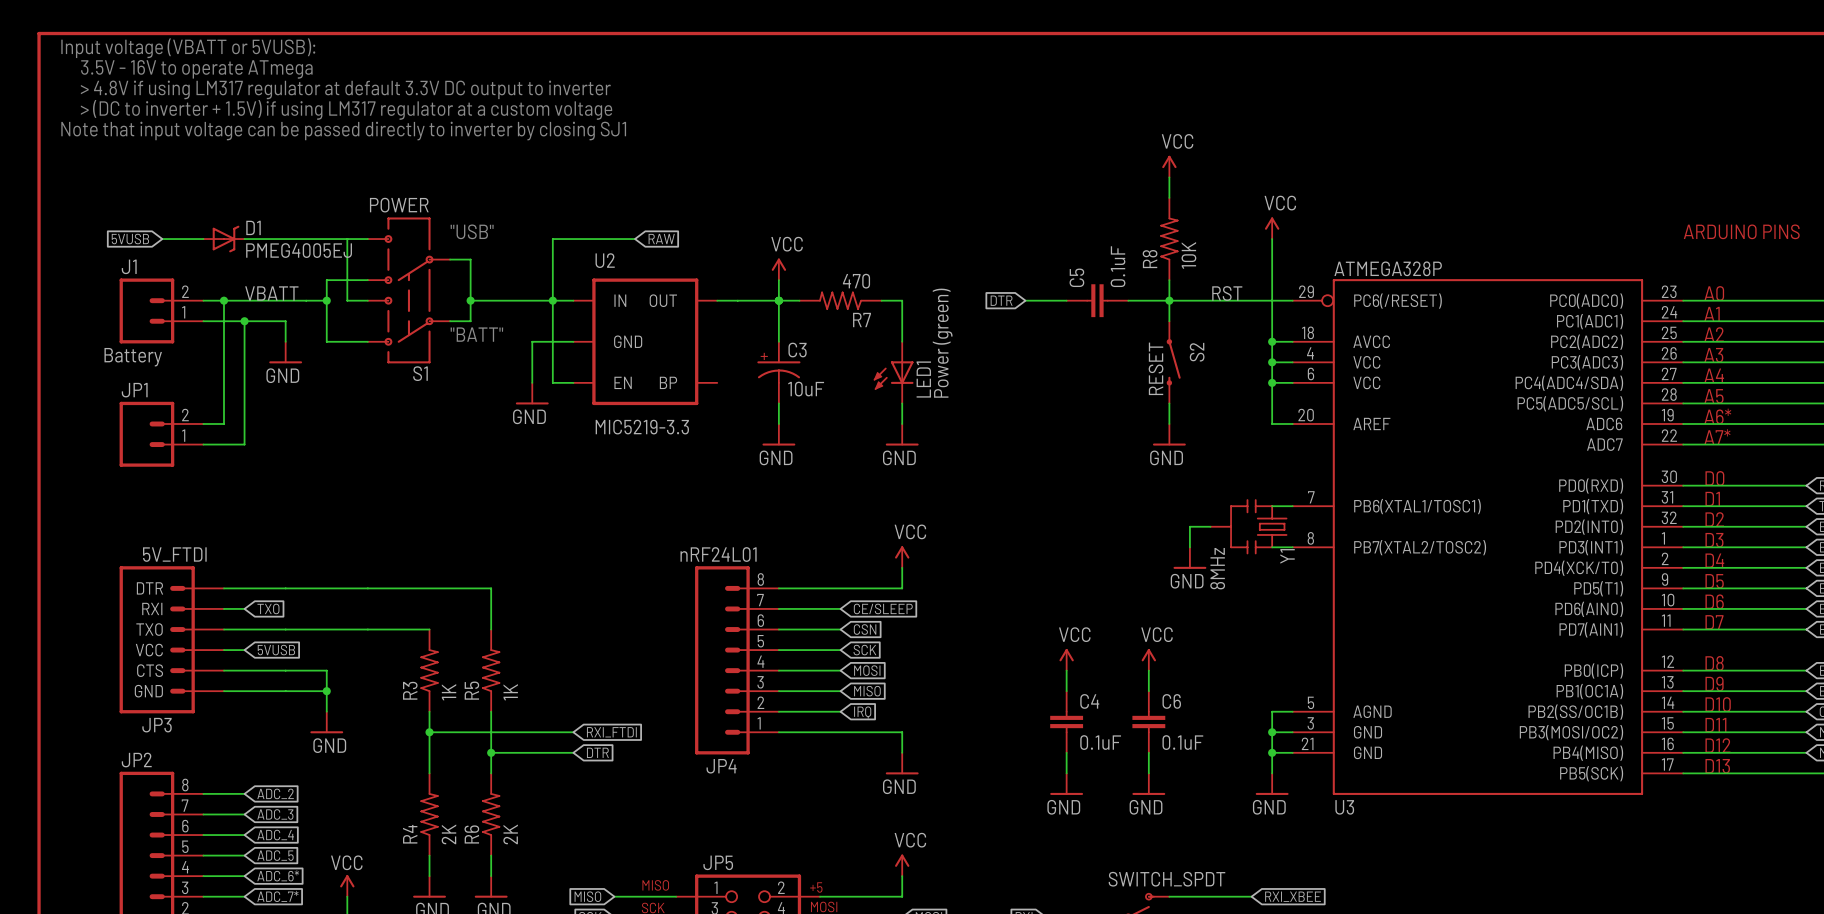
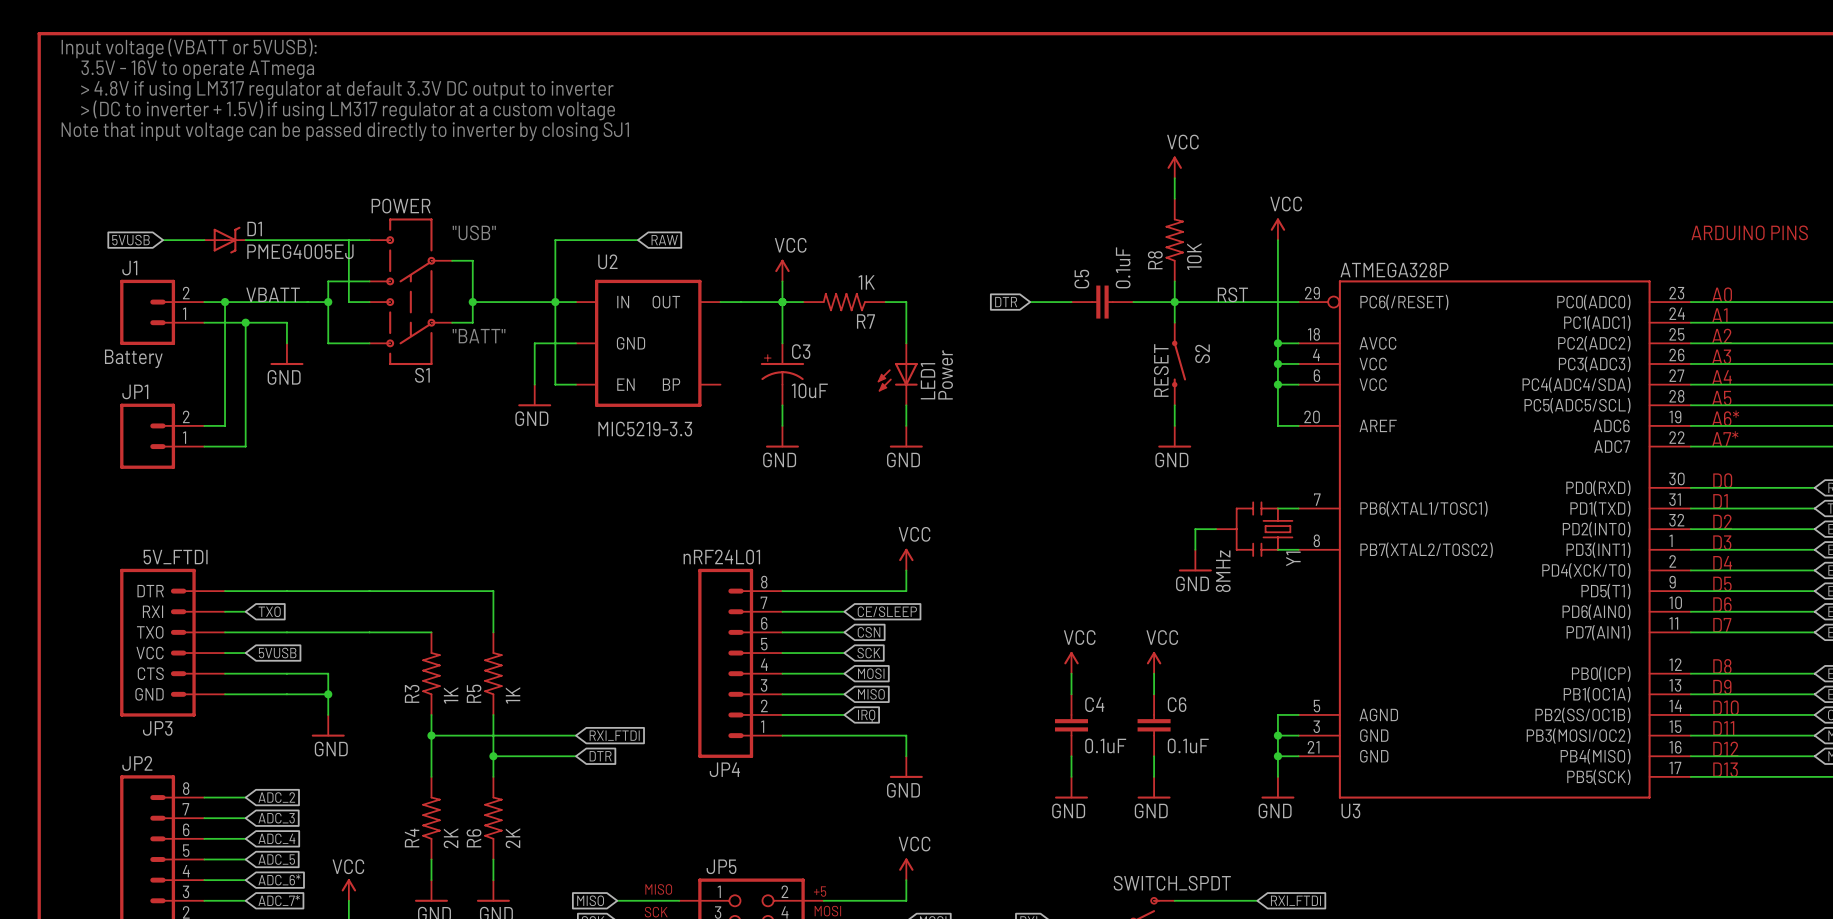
R7 value: 470 (856, 281) -> 1K (866, 282)
LED1 value: Power (green) (942, 343) -> Power (945, 374)
global label: RXI_XBEE (1293, 896) -> RXI_FTDI (1295, 900)

